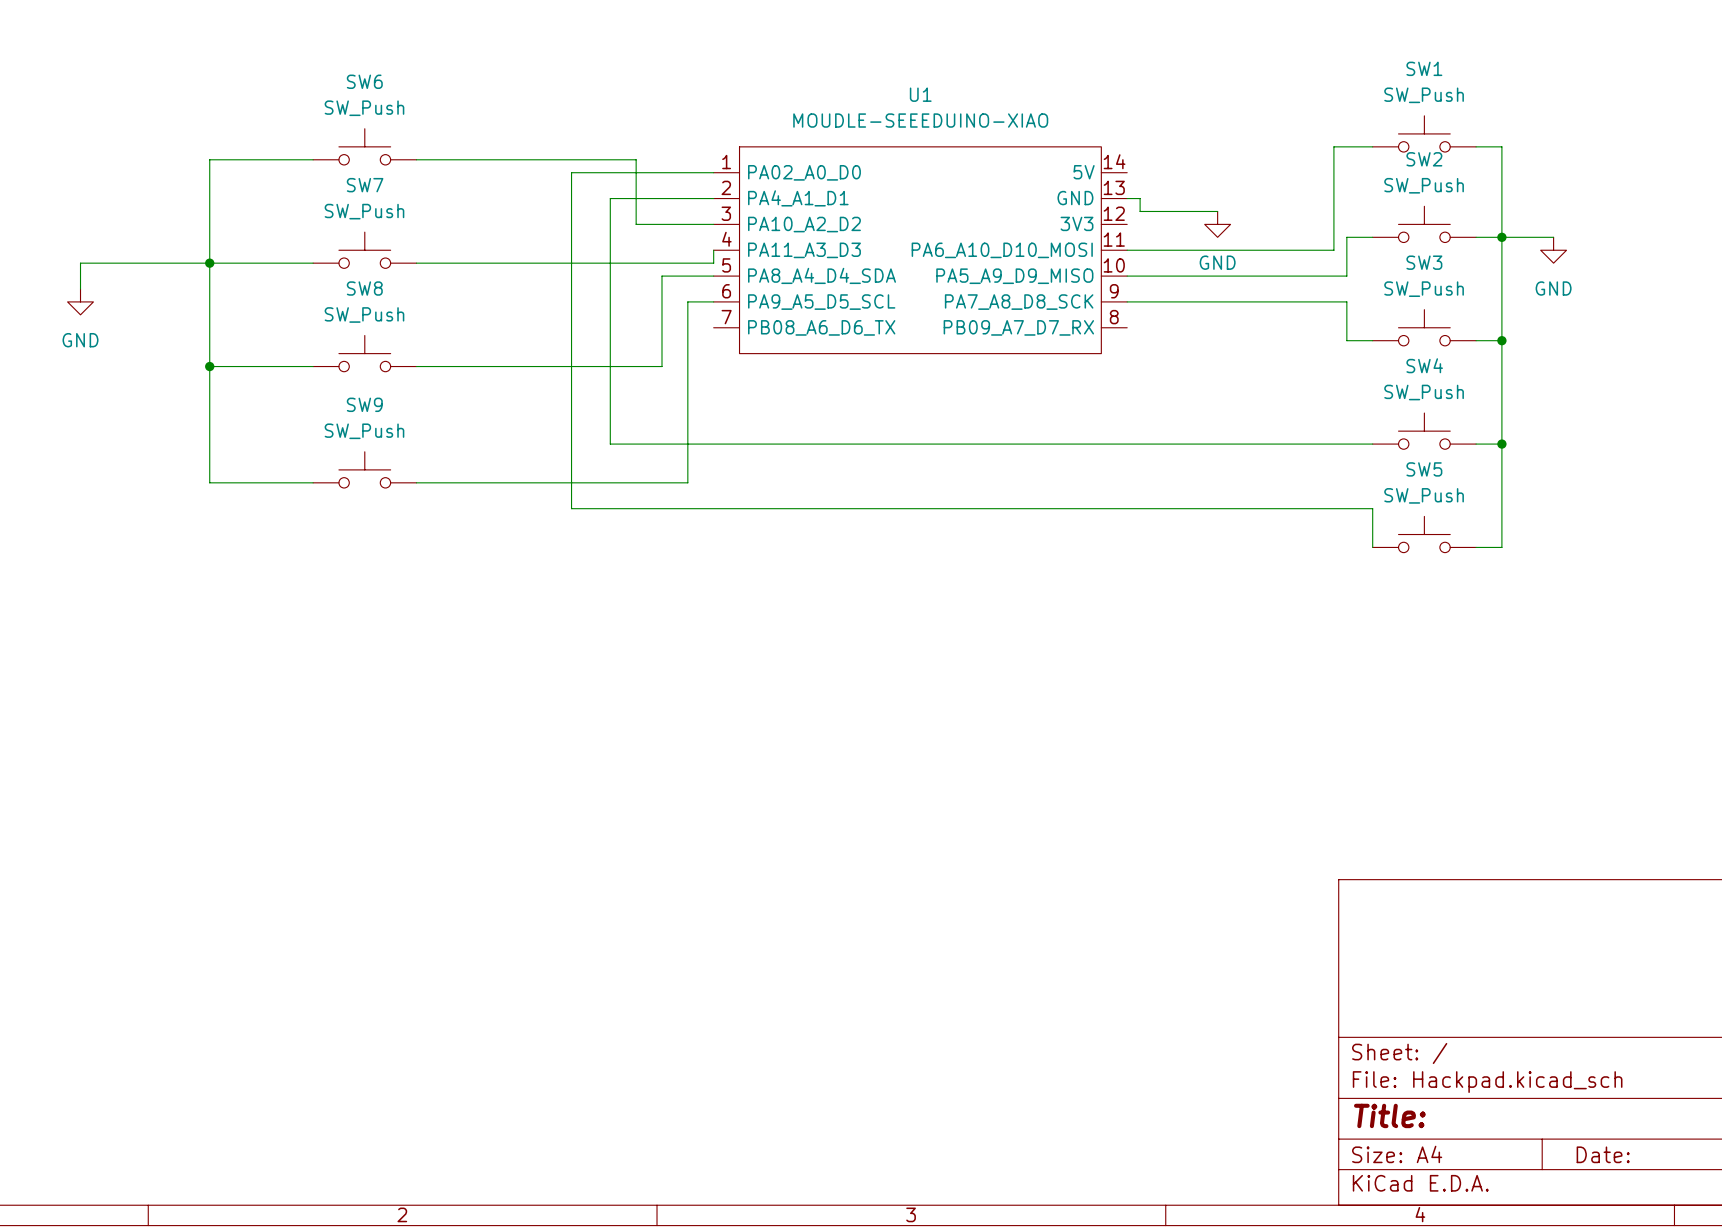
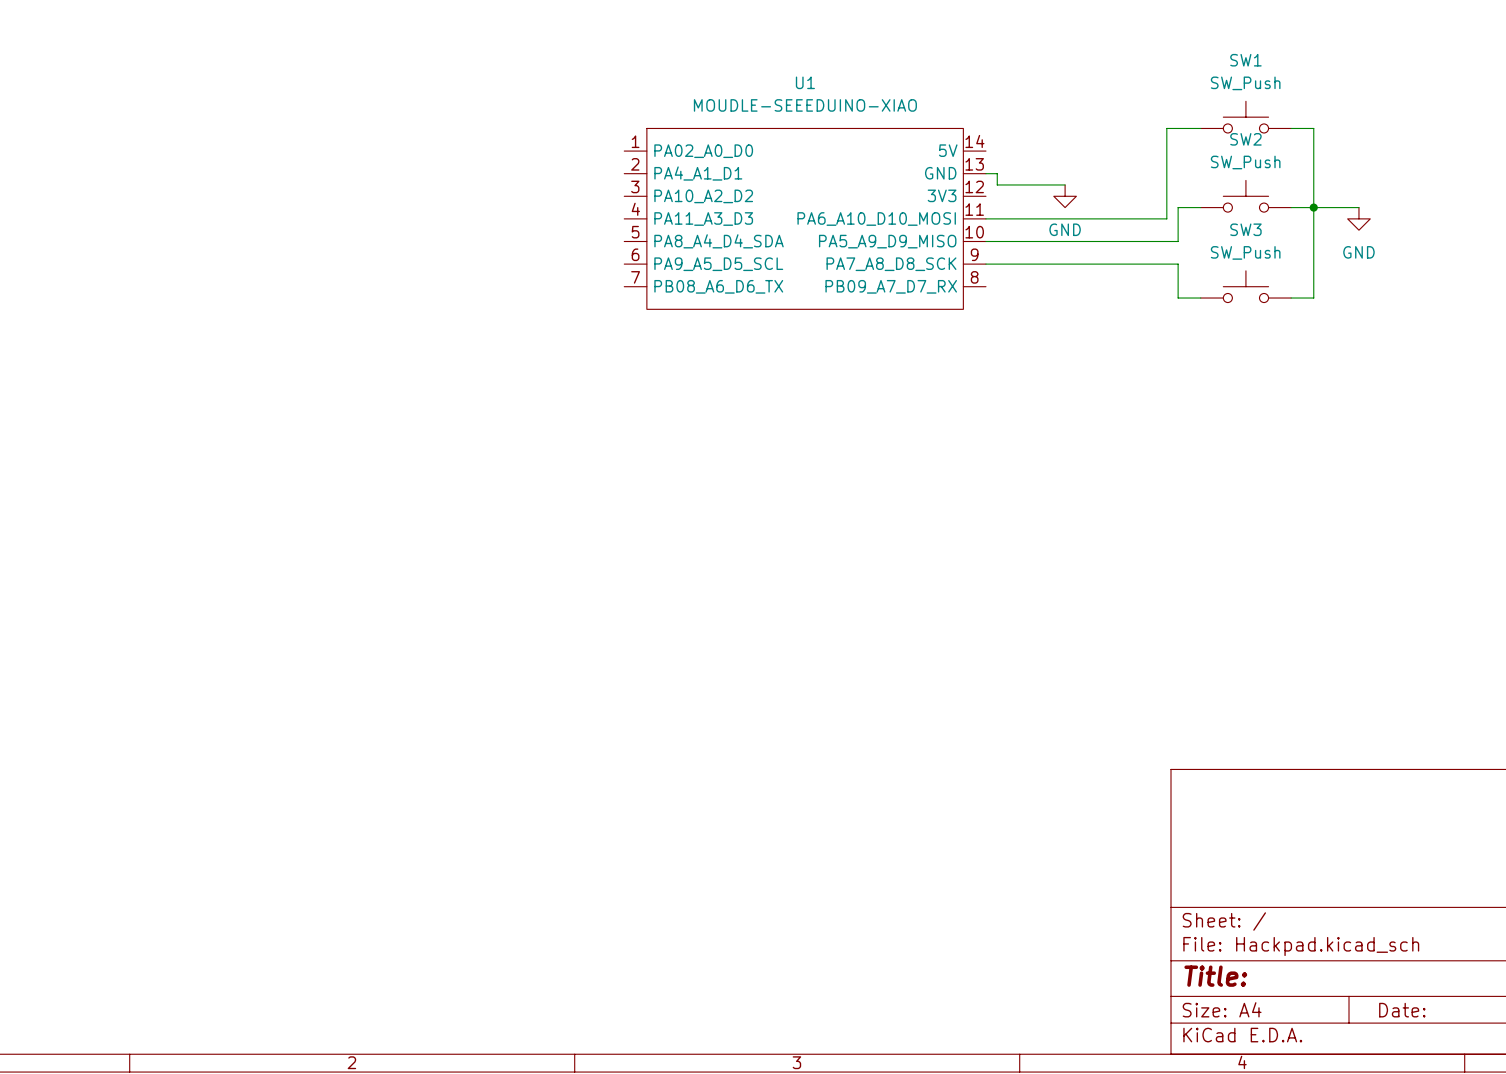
SW6: SW_Push (364, 146) -> none
wire: (313, 159) (209, 159) (209, 482) (313, 482) -> none
wire: (416, 159) (636, 159) (636, 224) (713, 224) -> none
wire: (713, 172) (571, 172) (571, 508) (1372, 508) (1372, 547) -> none
wire: (713, 198) (610, 198) (610, 444) (1372, 444) -> none
SW7: SW_Push (364, 250) -> none
wire: (713, 250) (713, 263) (416, 263) -> none
junction: (209, 263) -> none
wire: (313, 263) (80, 263) (80, 289) -> none
wire: (713, 276) (661, 276) (661, 366) (416, 366) -> none
power symbol: GND (80, 301) -> none
wire: (713, 301) (687, 301) (687, 482) (416, 482) -> none
wire: (1501, 340) (1501, 547) (1476, 547) -> none
junction: (1501, 340) -> none
SW8: SW_Push (364, 353) -> none
wire: (209, 366) (313, 366) -> none
junction: (209, 366) -> none
SW4: SW_Push (1424, 431) -> none
wire: (1476, 444) (1501, 444) -> none
junction: (1501, 444) -> none
SW9: SW_Push (364, 469) -> none
SW5: SW_Push (1424, 534) -> none

